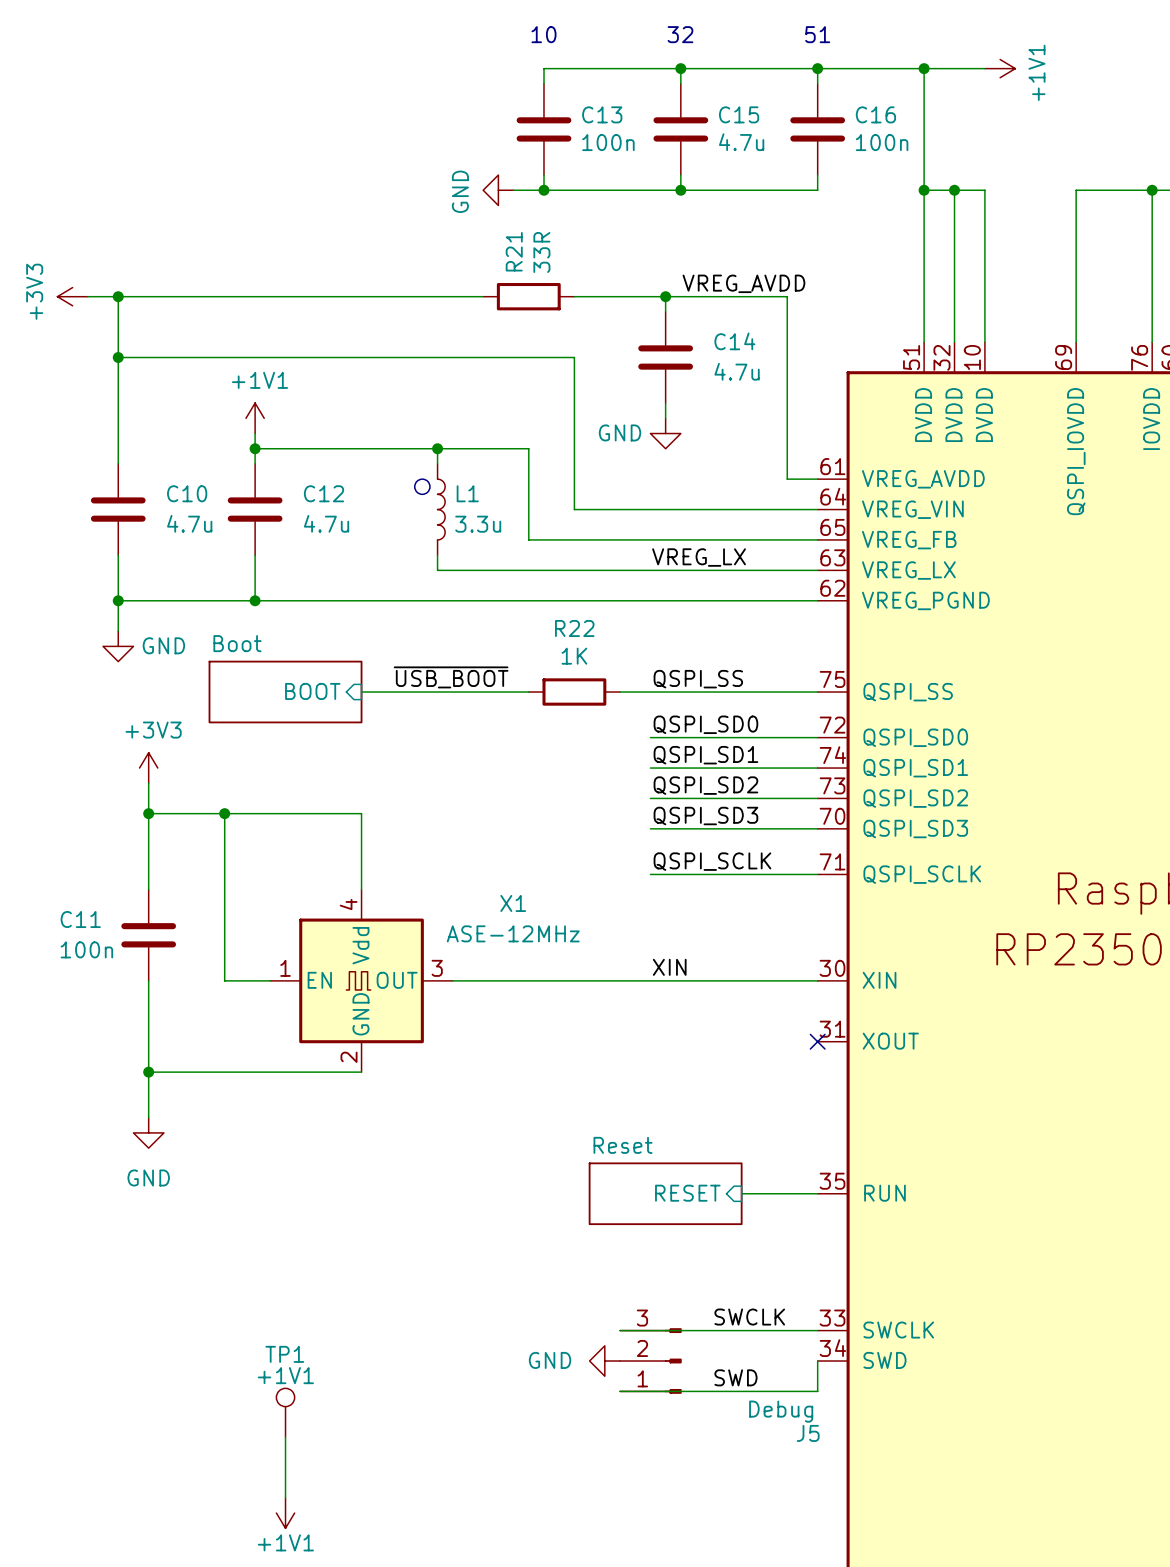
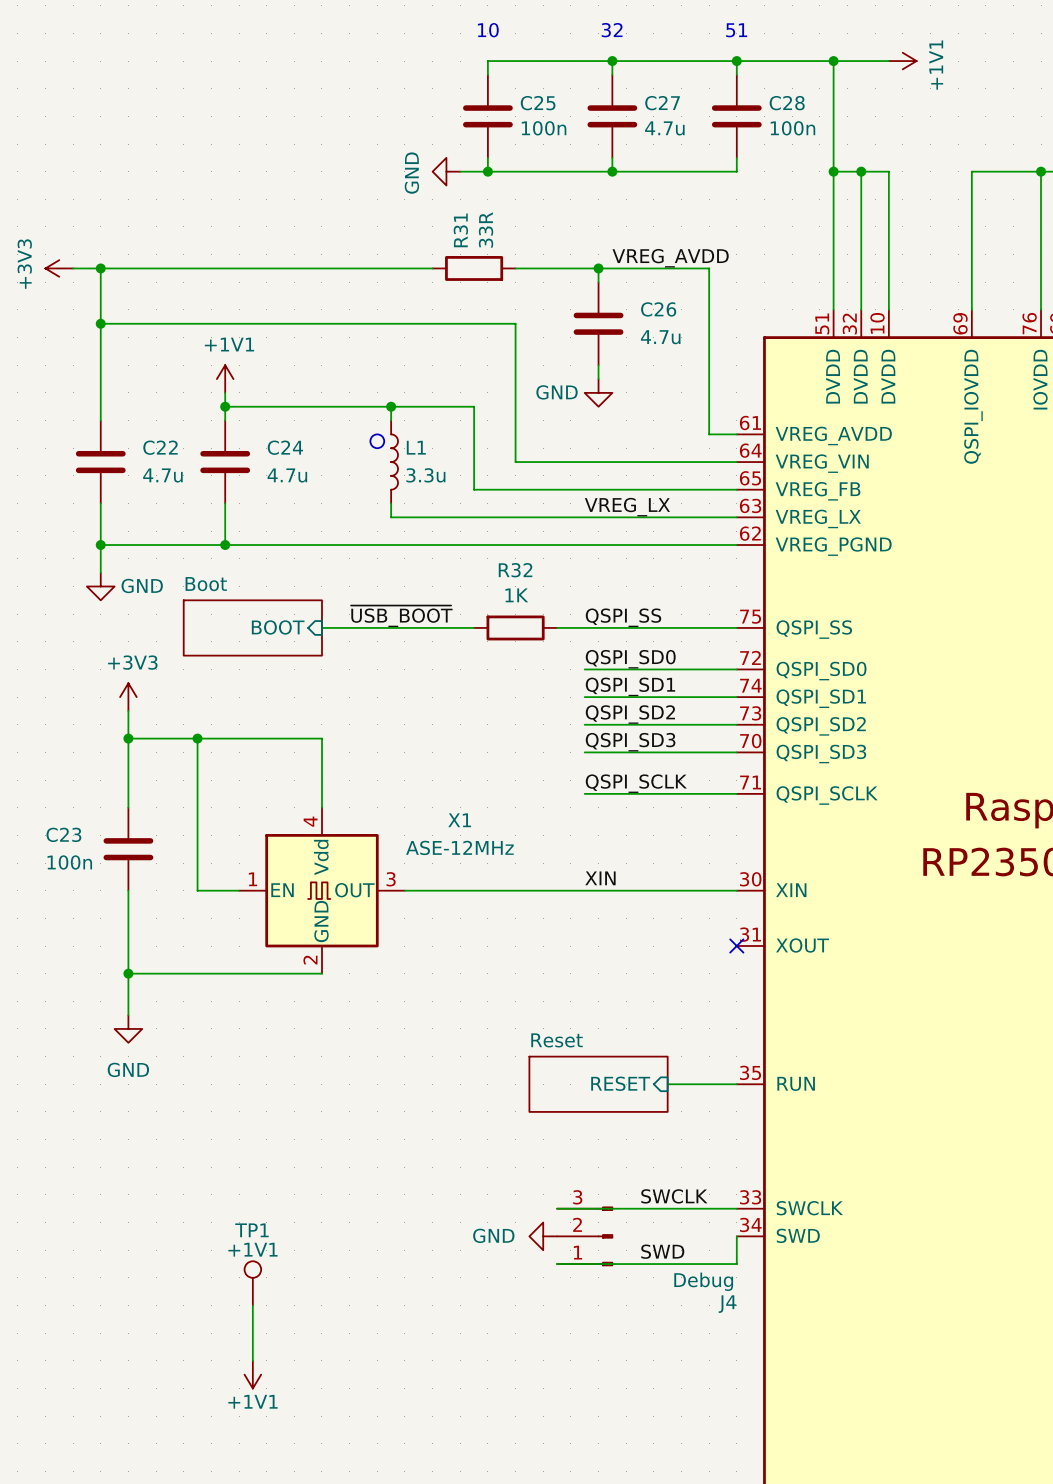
C13 name: C13 (602, 114) -> C25 (538, 103)
C15 name: C15 (739, 114) -> C27 (662, 103)
C16 name: C16 (875, 114) -> C28 (787, 103)
R21 name: R21 (514, 251) -> R31 (460, 230)
C14 name: C14 (734, 341) -> C26 (658, 309)
C10 name: C10 (187, 493) -> C22 (160, 447)
C12 name: C12 (324, 493) -> C24 (285, 447)
R22 name: R22 (574, 628) -> R32 (515, 570)
C11 name: C11 (80, 919) -> C23 (63, 834)
J5 name: J5 (808, 1433) -> J4 (727, 1304)

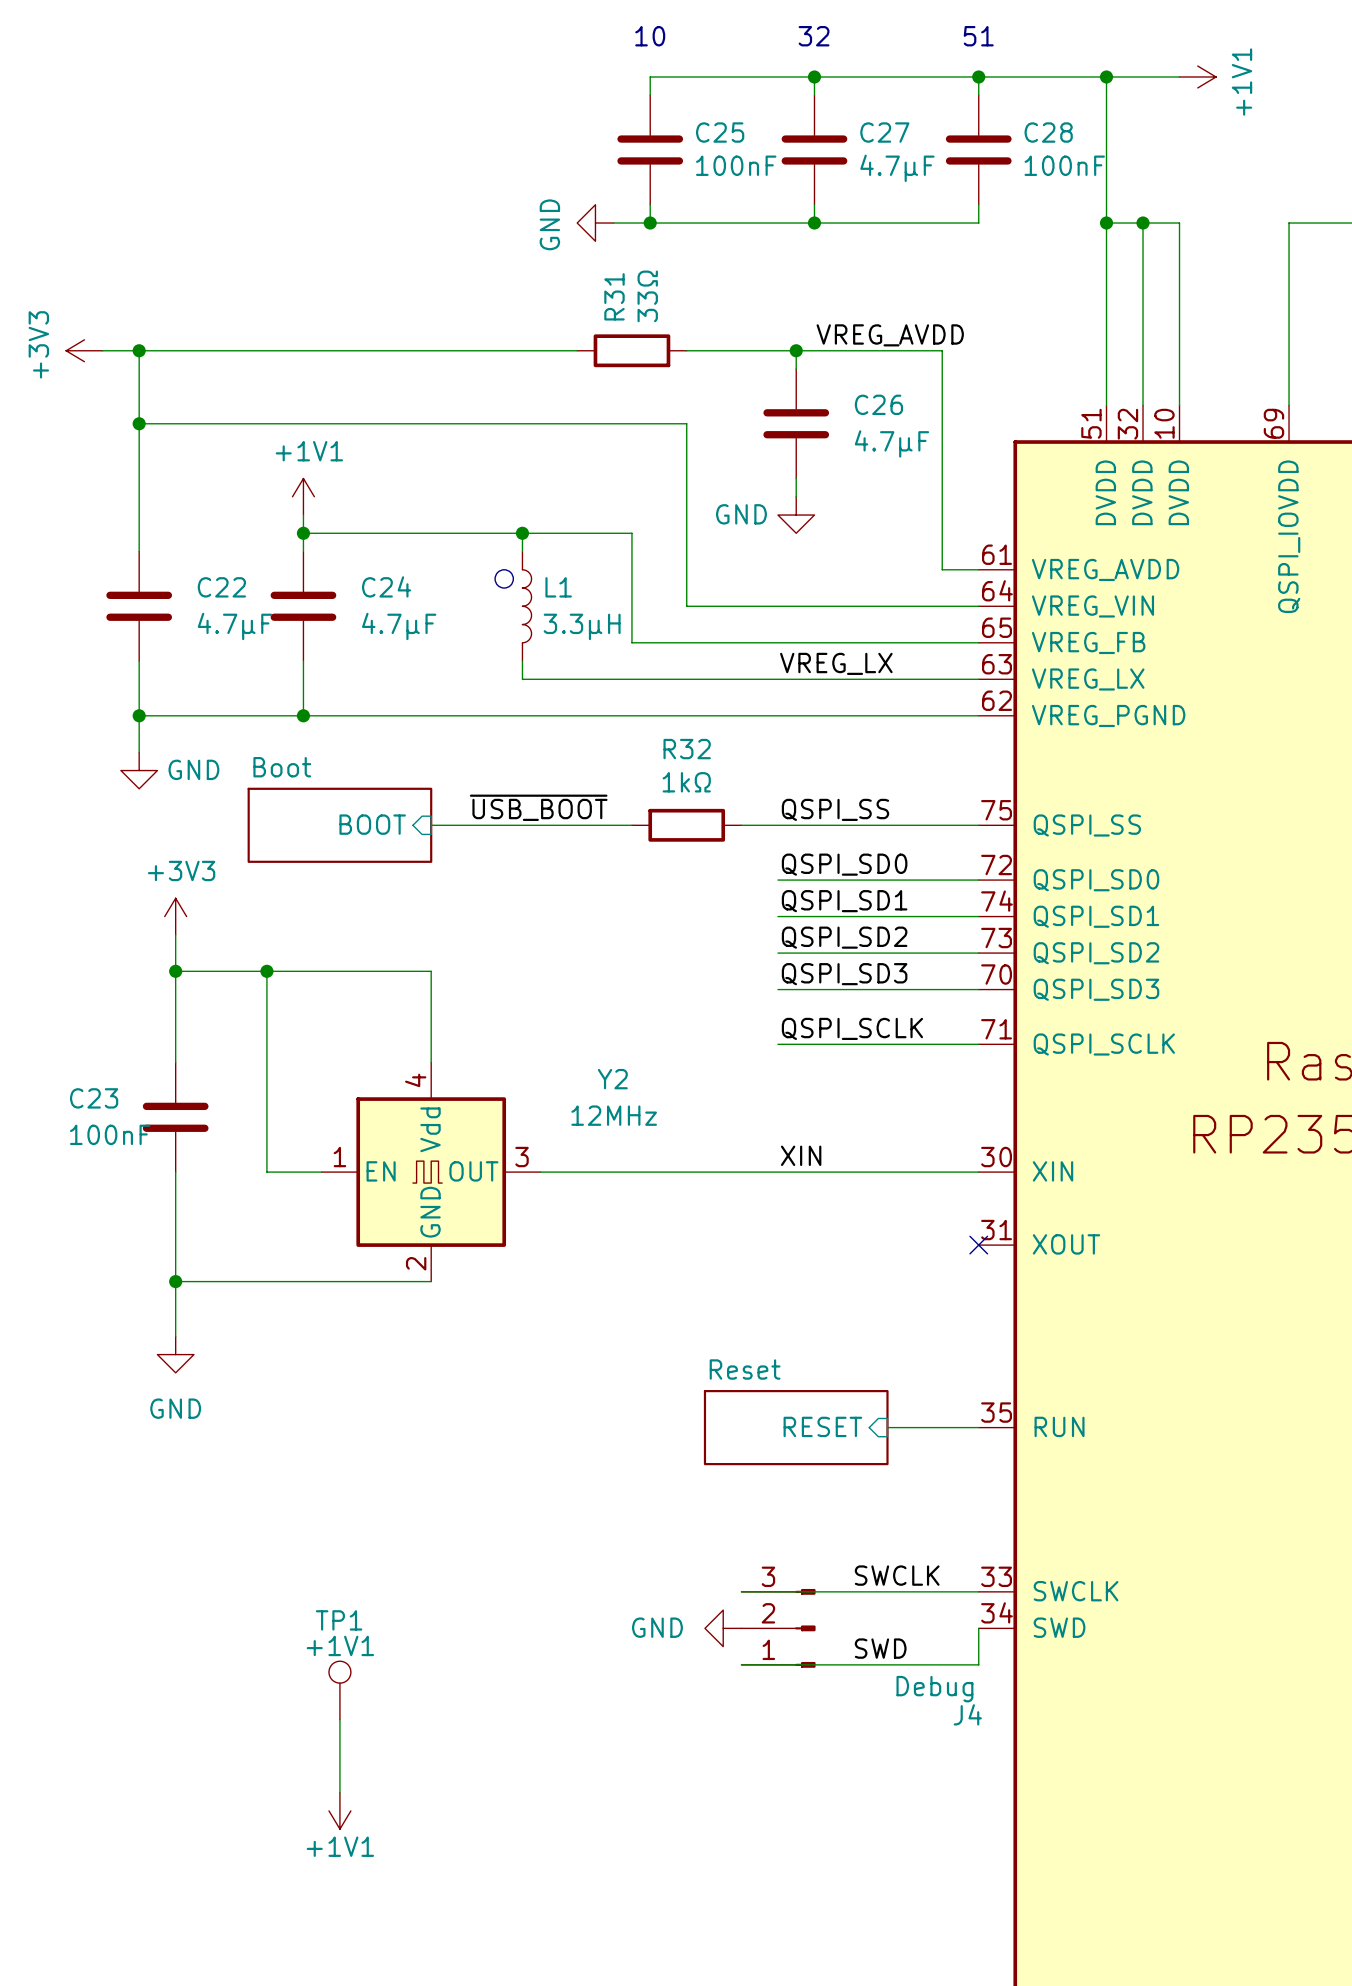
C25 value: 100n (544, 128) -> 100nF (736, 165)
C27 value: 4.7u (664, 128) -> 4.7µF (897, 168)
C28 value: 100n (792, 128) -> 100nF (1064, 165)
R31 value: 33R (486, 229) -> 33Ω (647, 296)
C26 value: 4.7u (660, 337) -> 4.7µF (891, 443)
C22 value: 4.7u (162, 475) -> 4.7µF (234, 626)
C24 value: 4.7u (287, 475) -> 4.7µF (399, 626)
L1 value: 3.3u (425, 475) -> 3.3µH (582, 626)
R32 value: 1K (516, 595) -> 1kΩ (686, 782)
X1 name: X1 (459, 820) -> Y2 (612, 1079)
X1 value: ASE-12MHz (459, 847) -> 12MHz (614, 1115)
C23 value: 100n (69, 862) -> 100nF (110, 1134)

